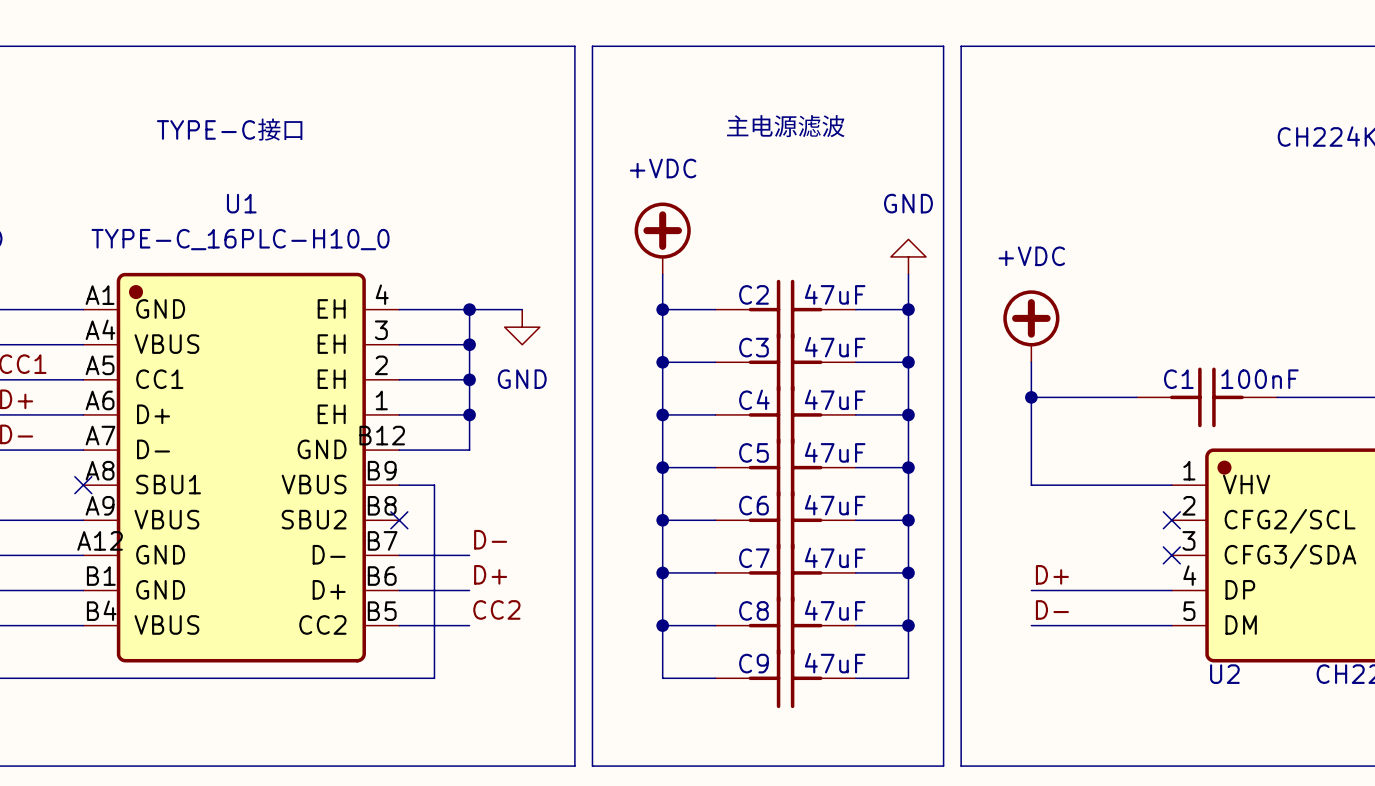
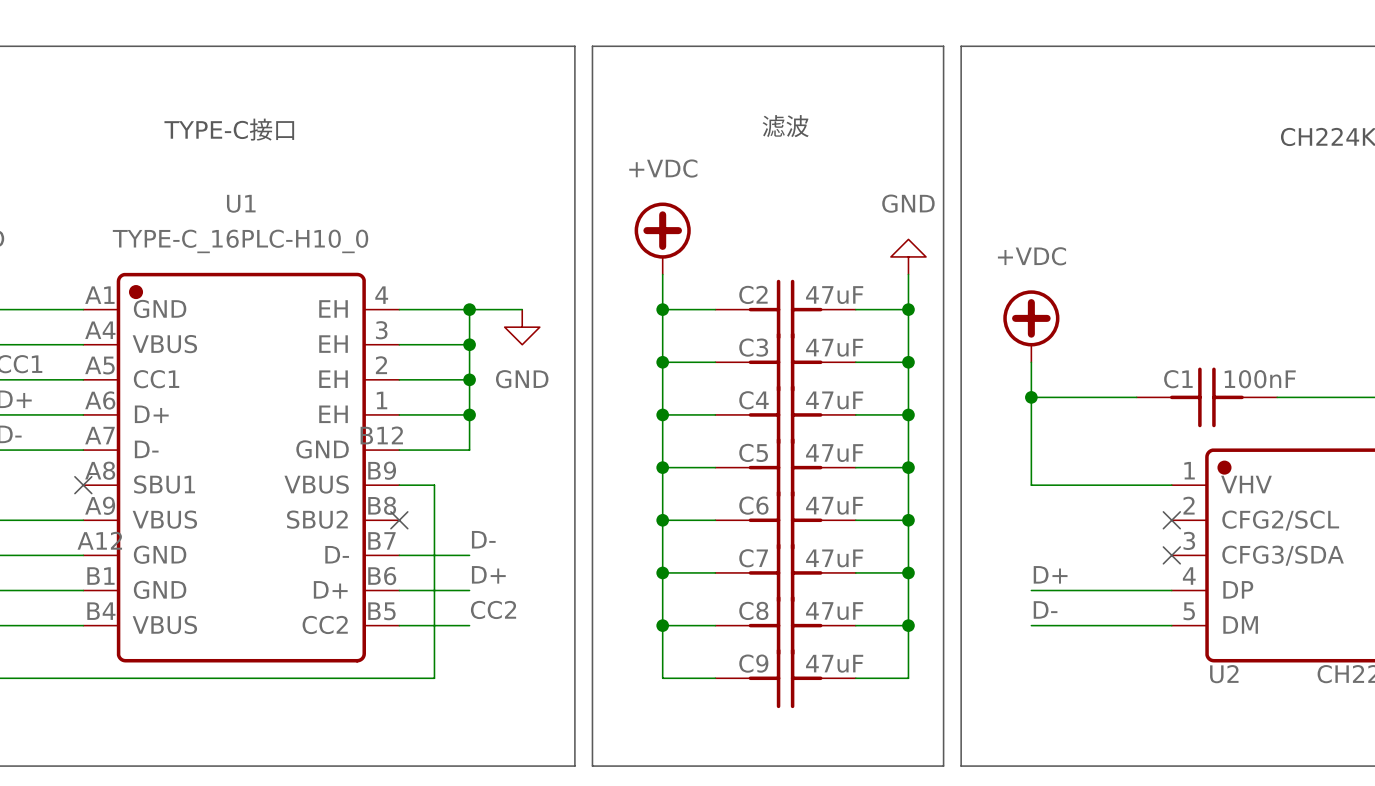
text: 主电源滤波 (785, 126) -> 滤波 (785, 126)

